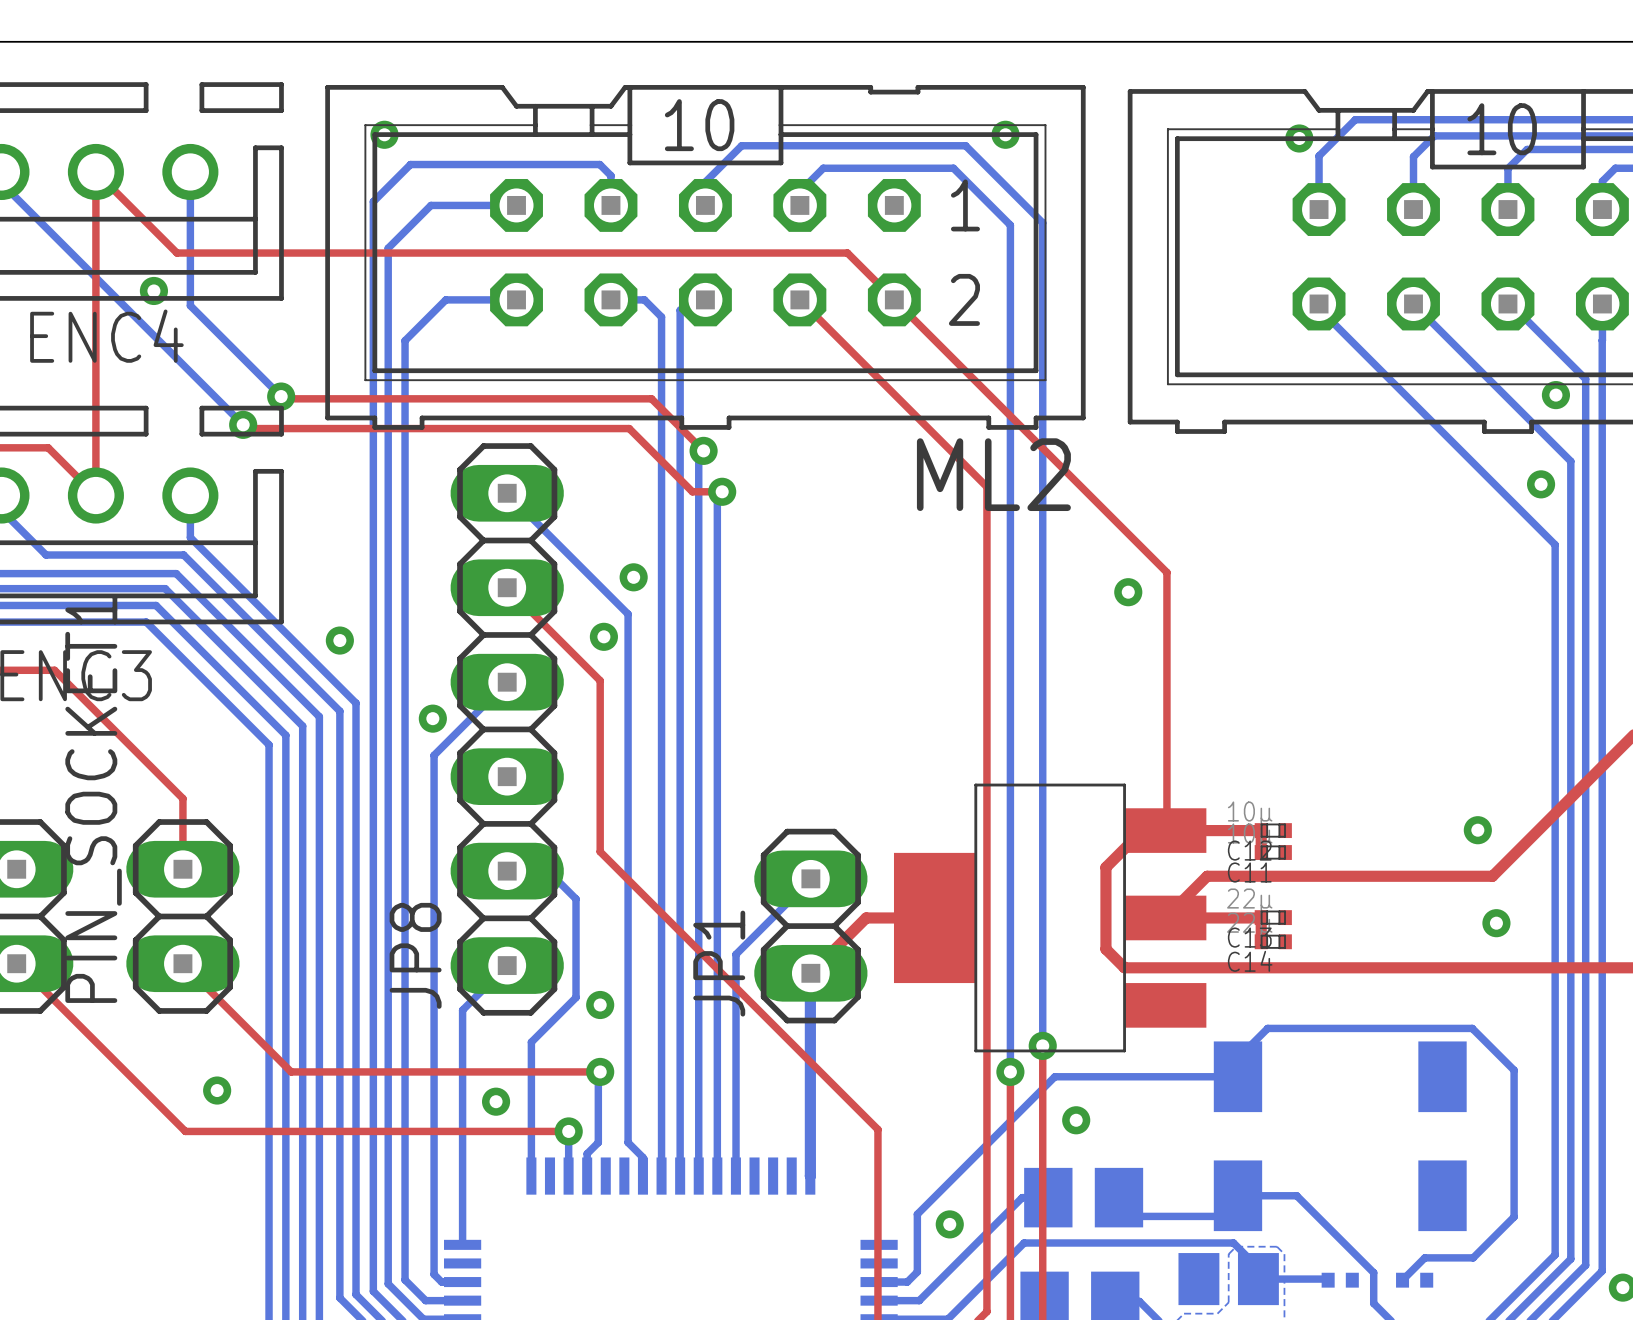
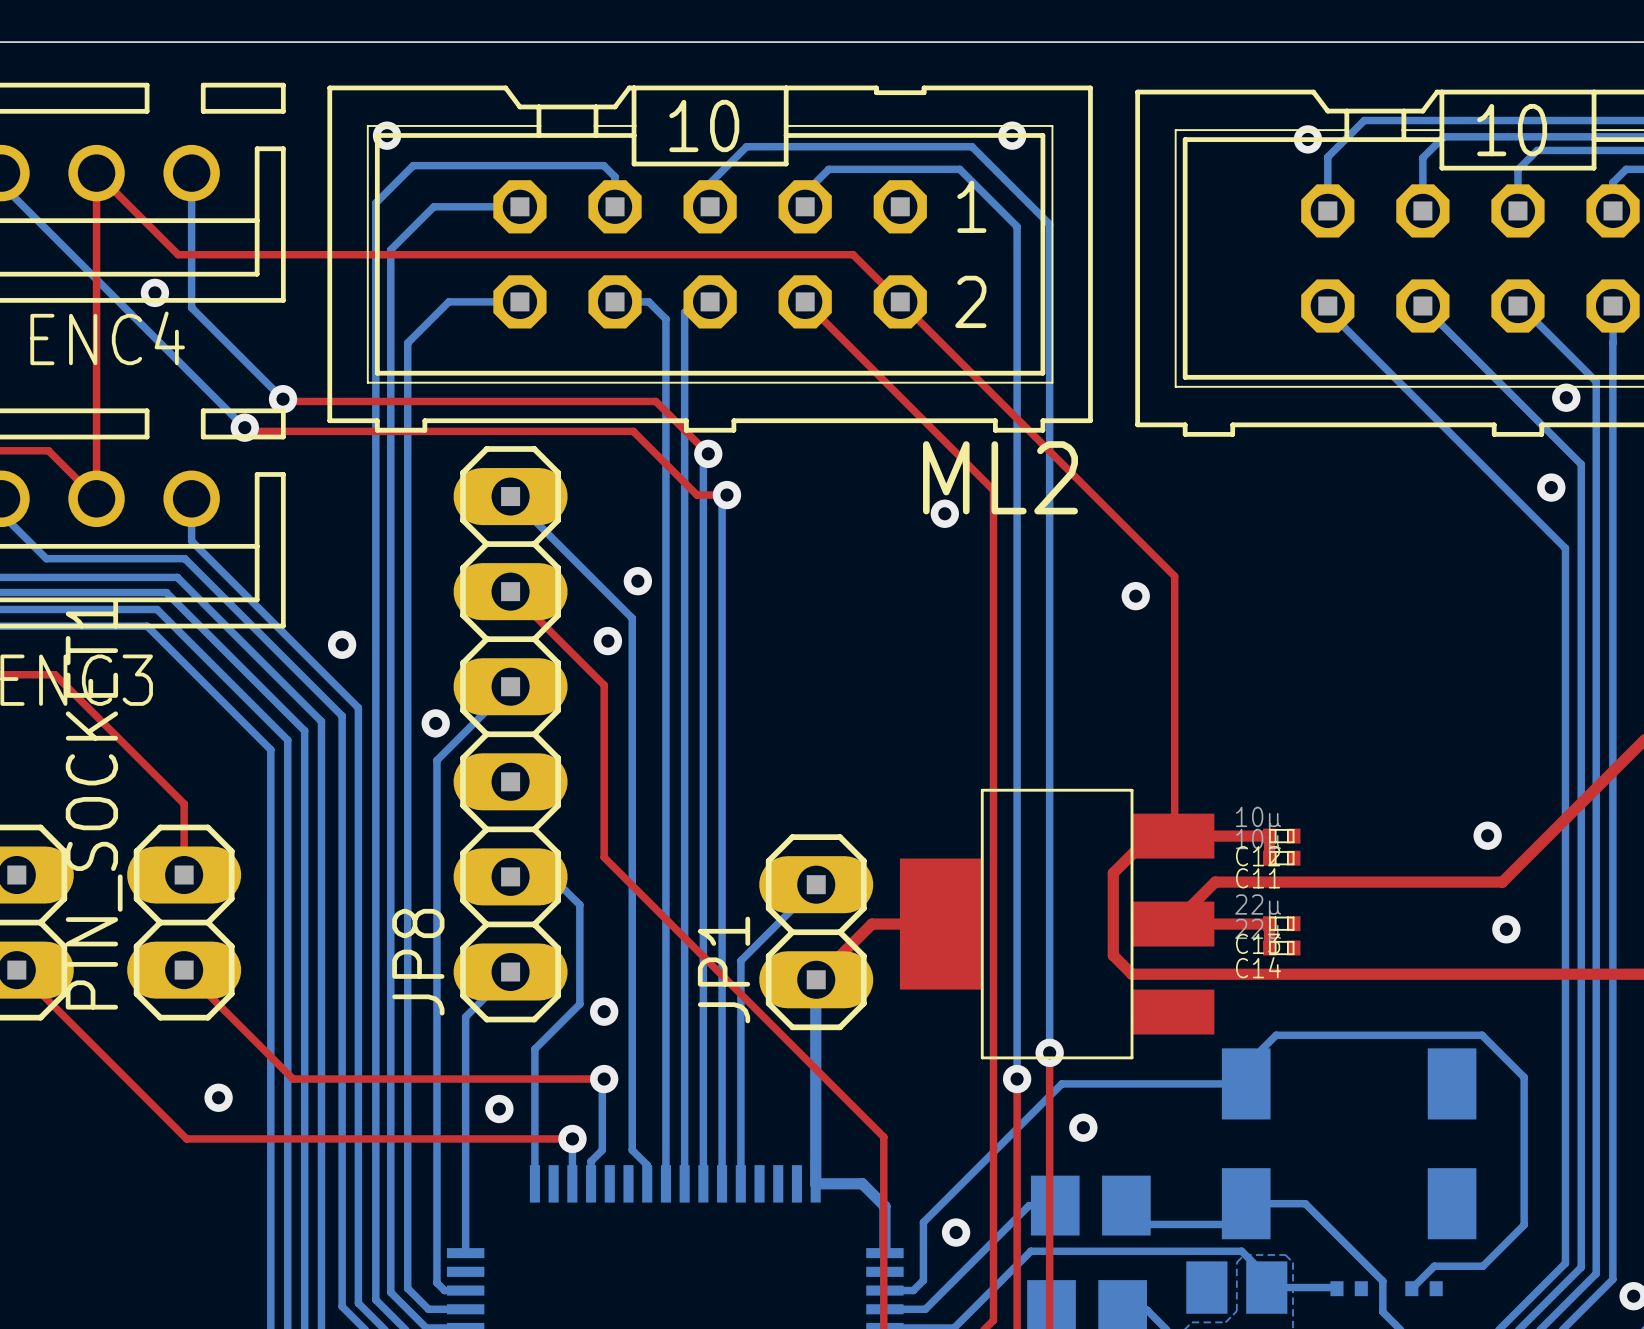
via: none -> (944, 513)
bottom track: none -> (815, 1183) (862, 1183) (884, 1206) (884, 1253)

